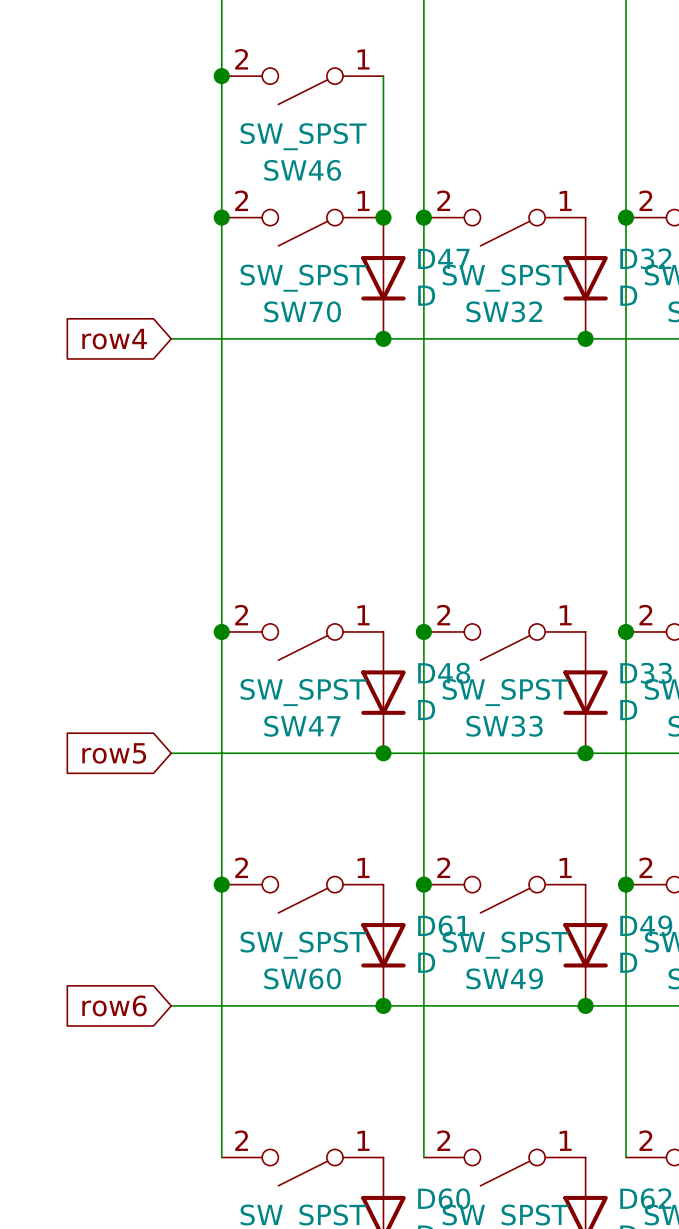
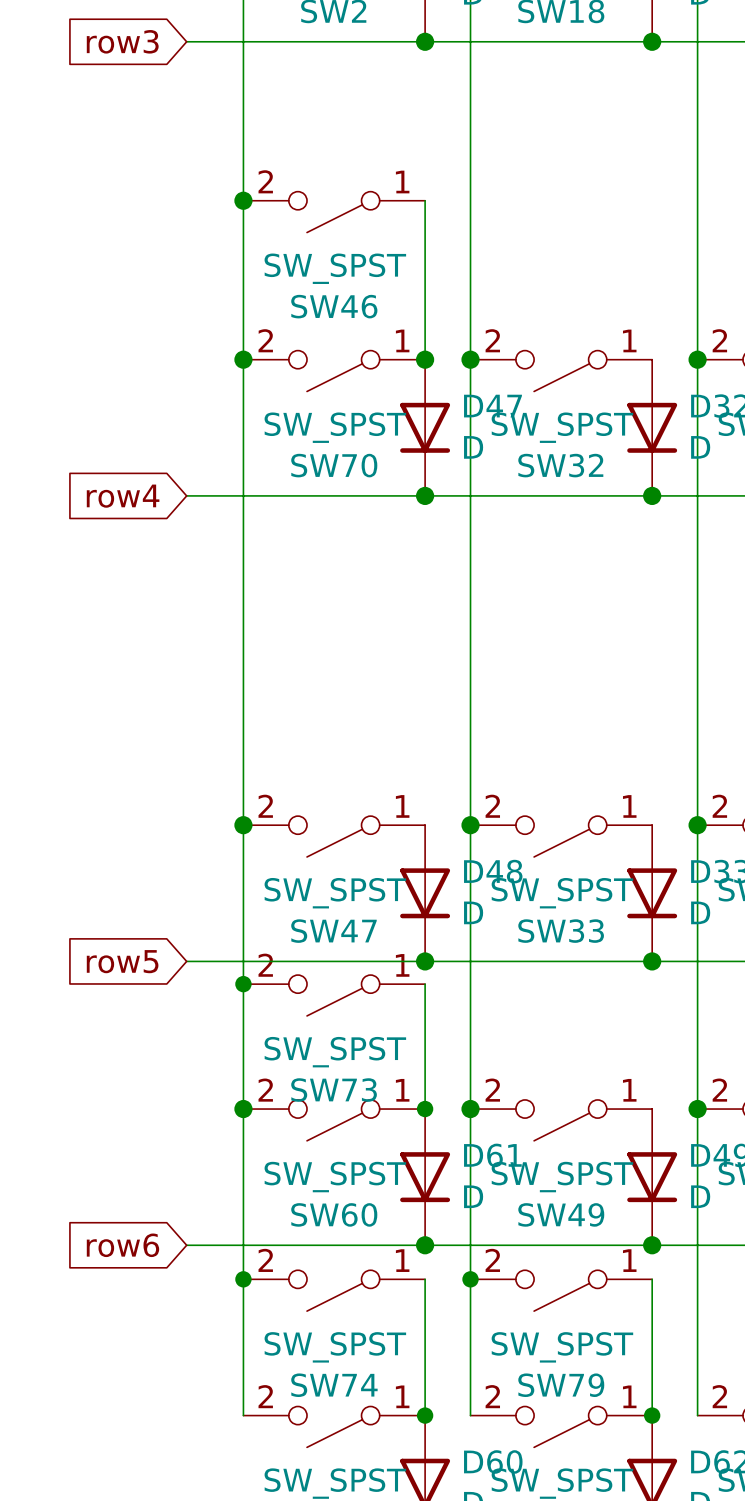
junction: none -> (243, 984)
wire: none -> (425, 984) (425, 1109)
SW73: none -> SW_SPST (334, 995)
junction: none -> (425, 1109)
junction: none -> (243, 1279)
wire: none -> (425, 1279) (425, 1415)
junction: none -> (470, 1279)
wire: none -> (652, 1279) (652, 1415)
SW74: none -> SW_SPST (334, 1290)
SW79: none -> SW_SPST (561, 1290)
junction: none -> (425, 1415)
junction: none -> (652, 1415)

